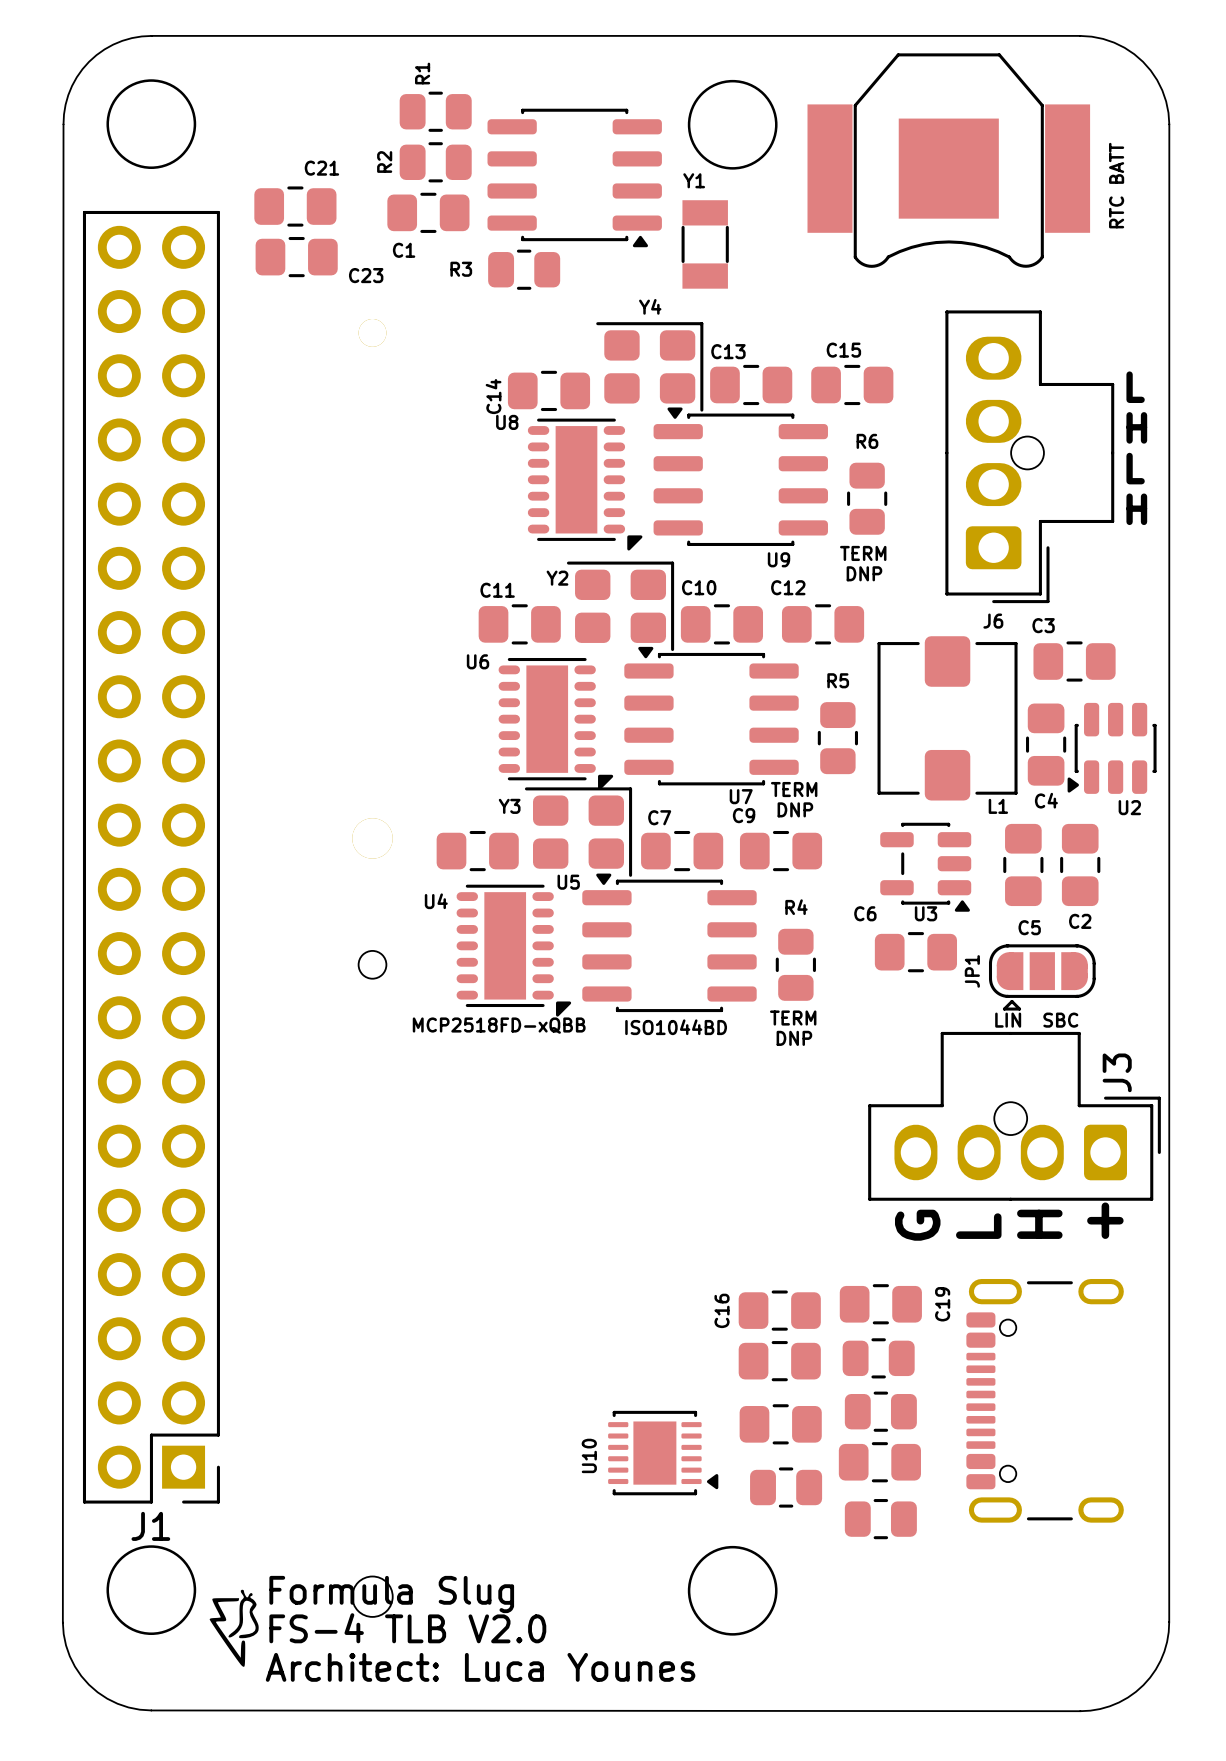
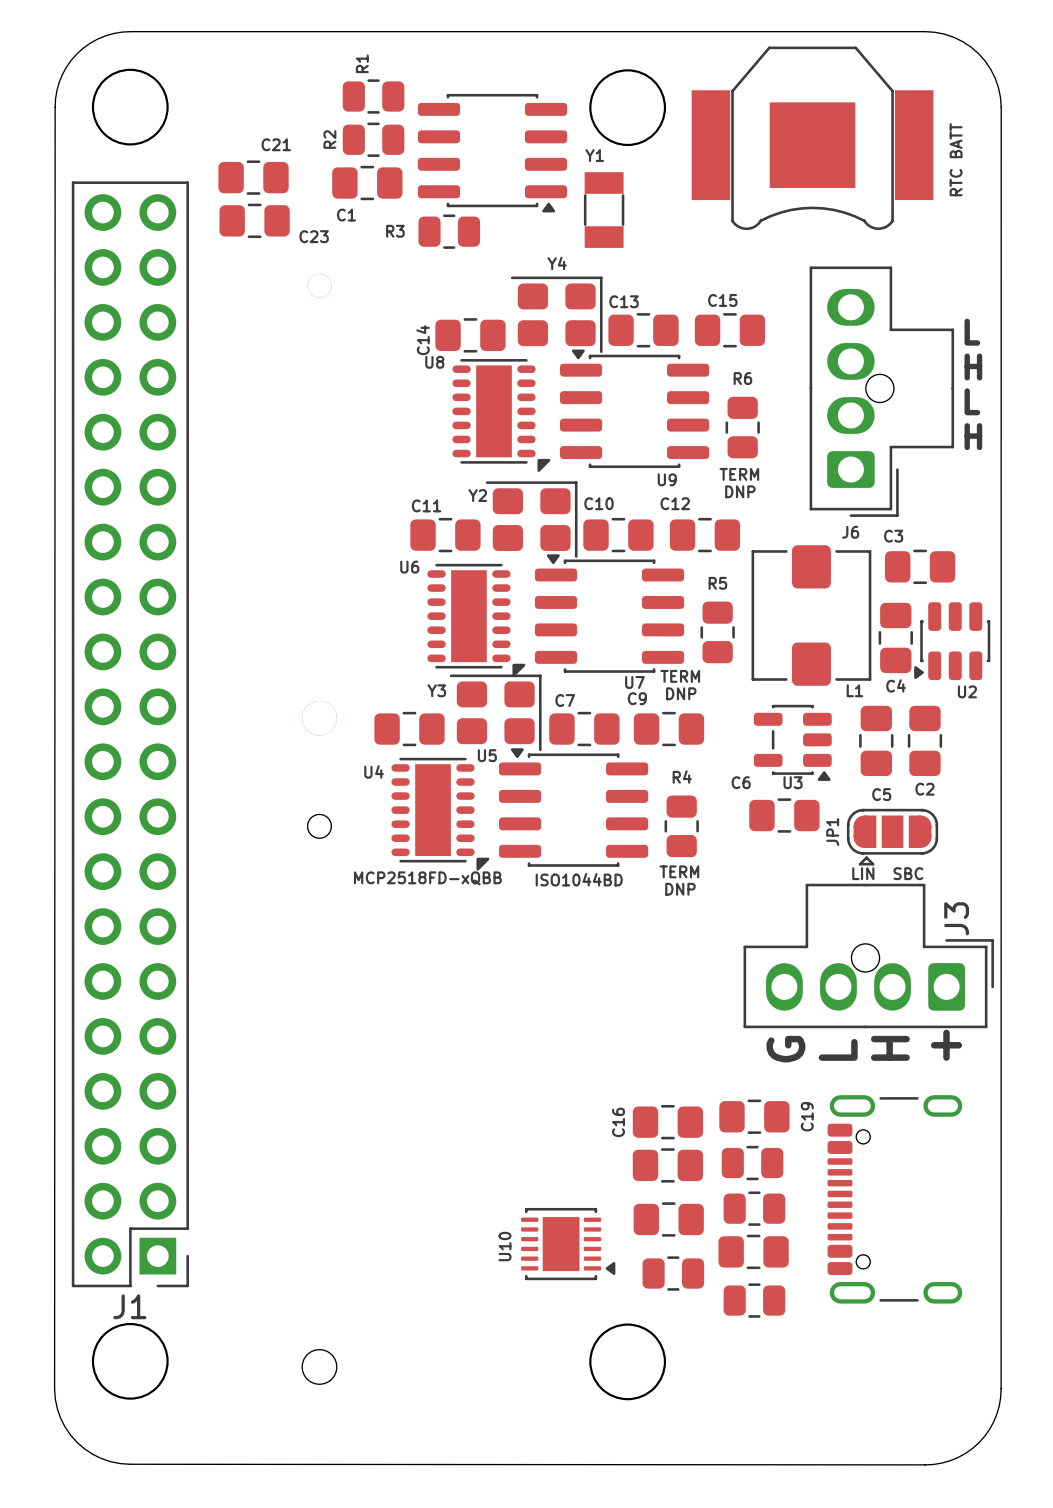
drawing: [209, 1589, 259, 1667] -> none

